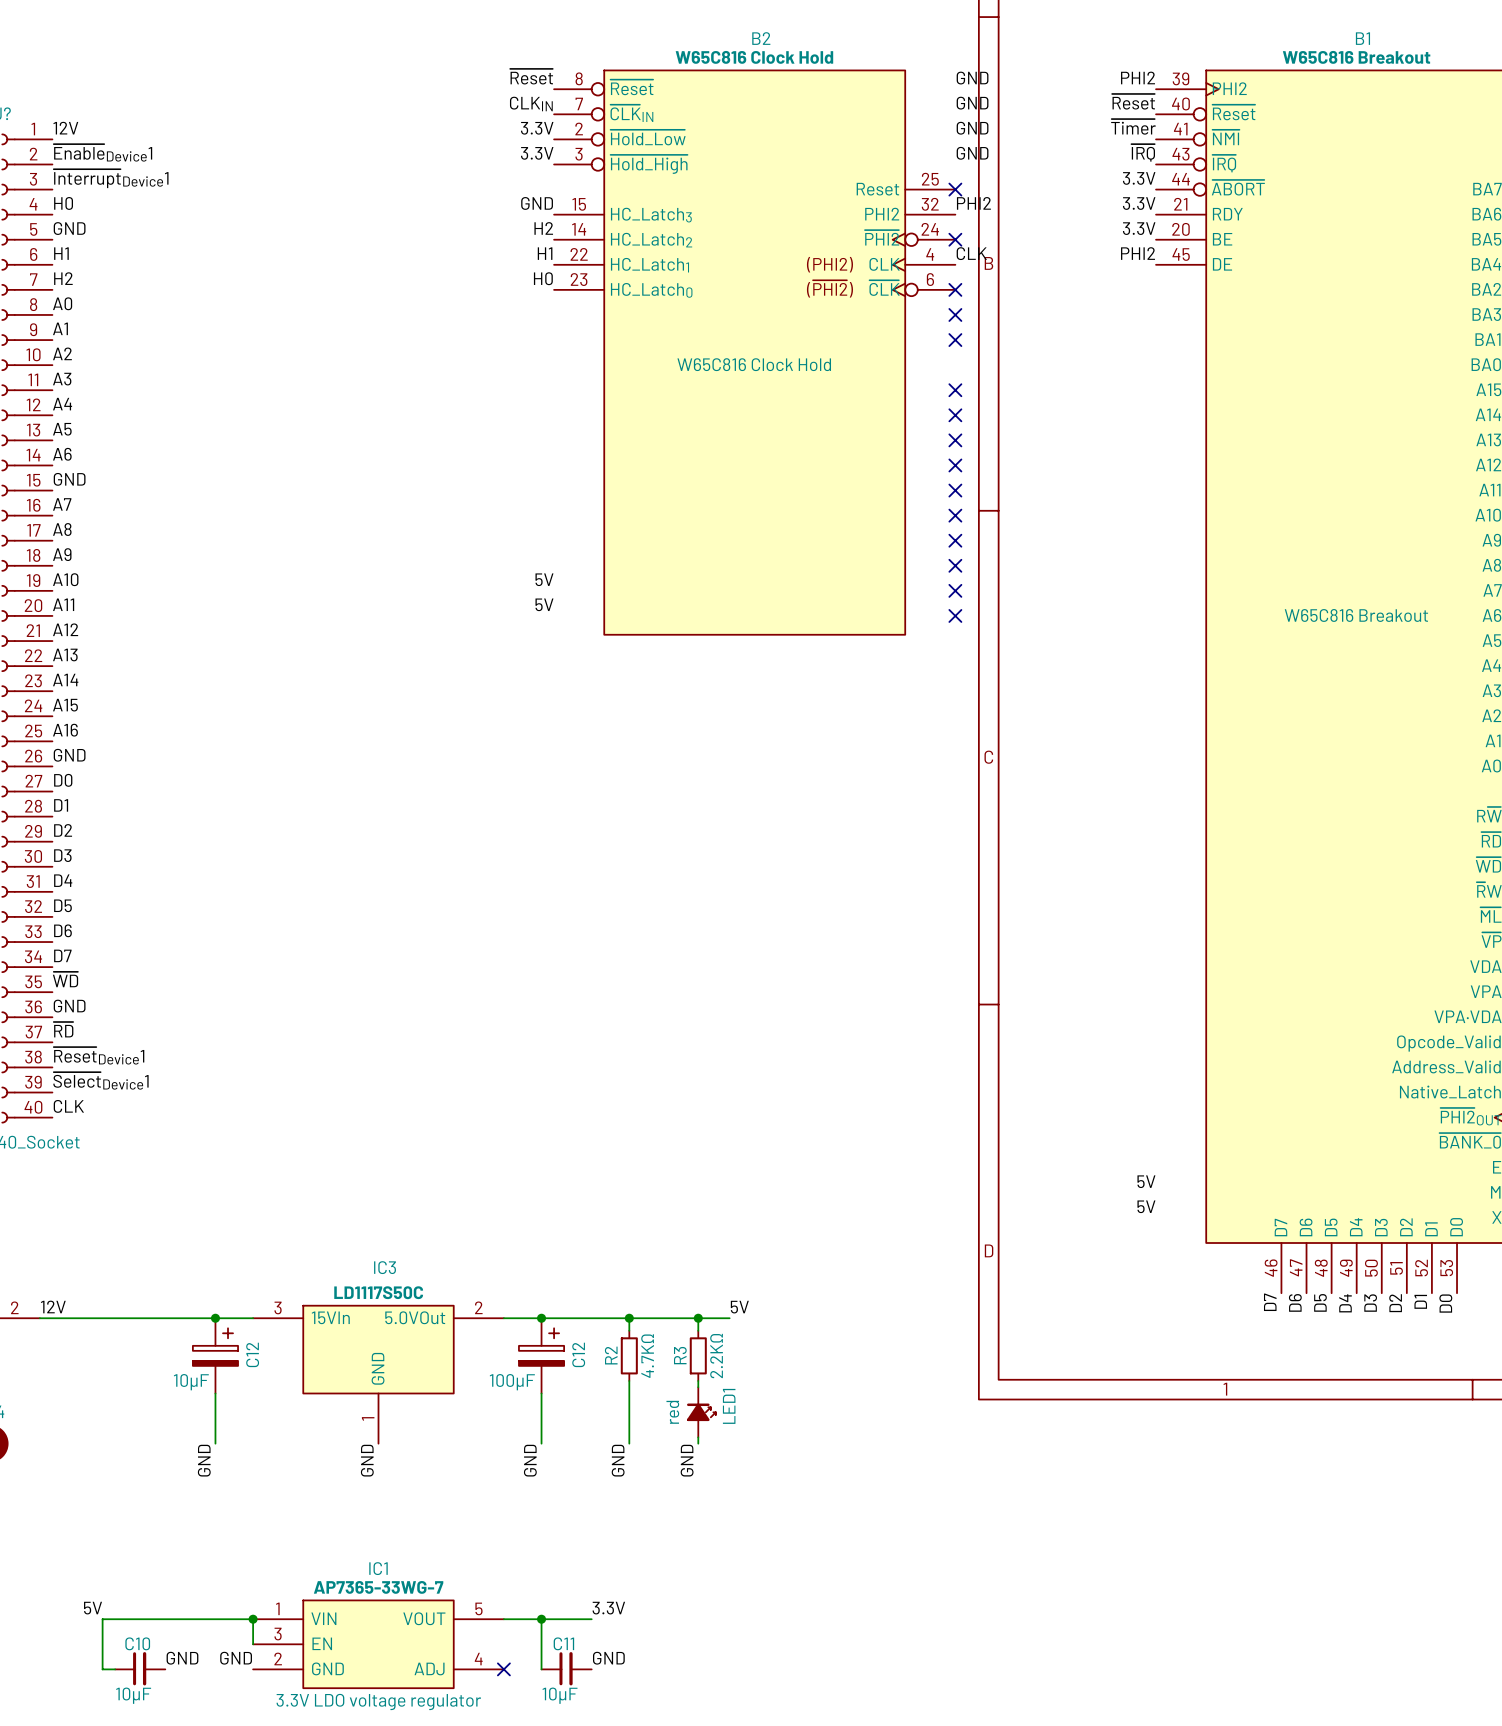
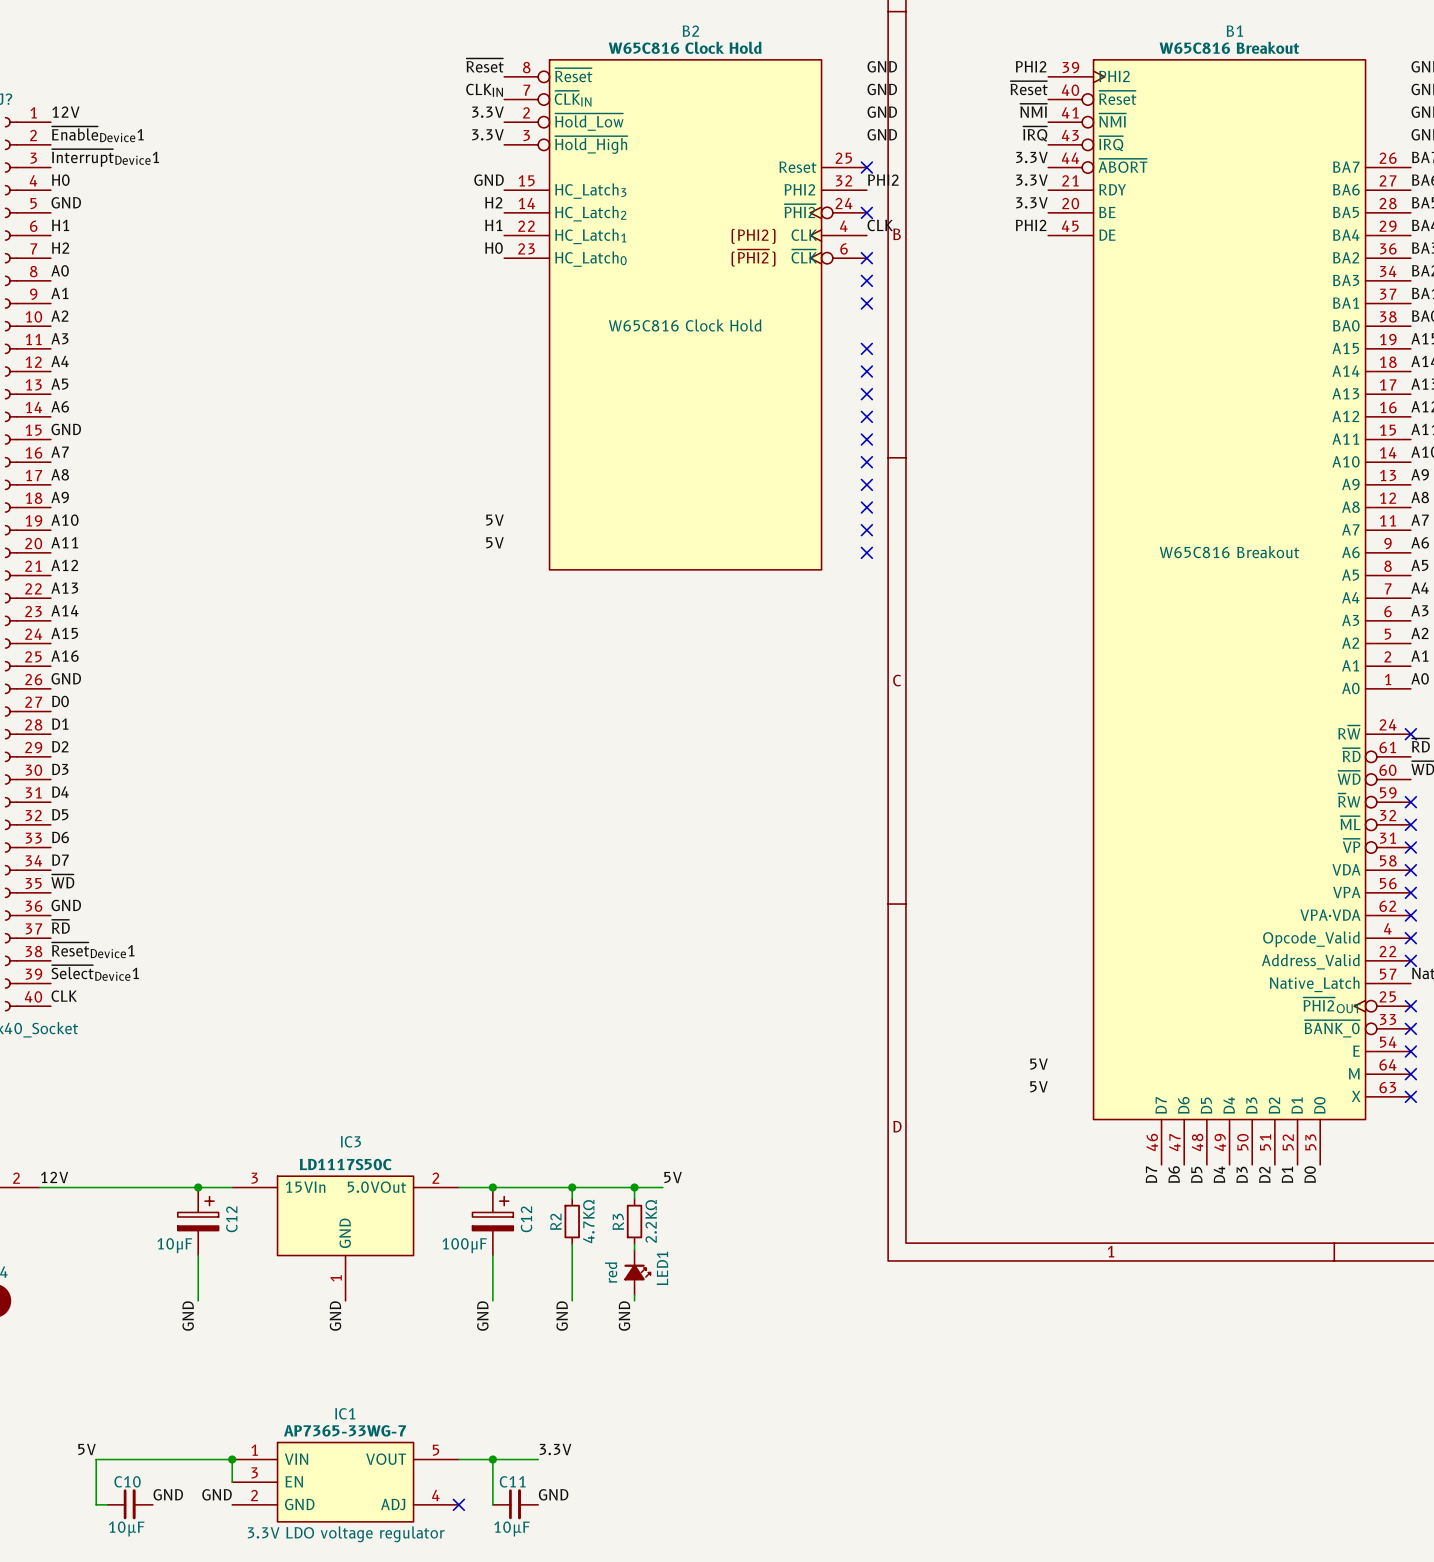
label: ~{Timer} (1133, 126) -> ~{NMI} (1033, 110)

